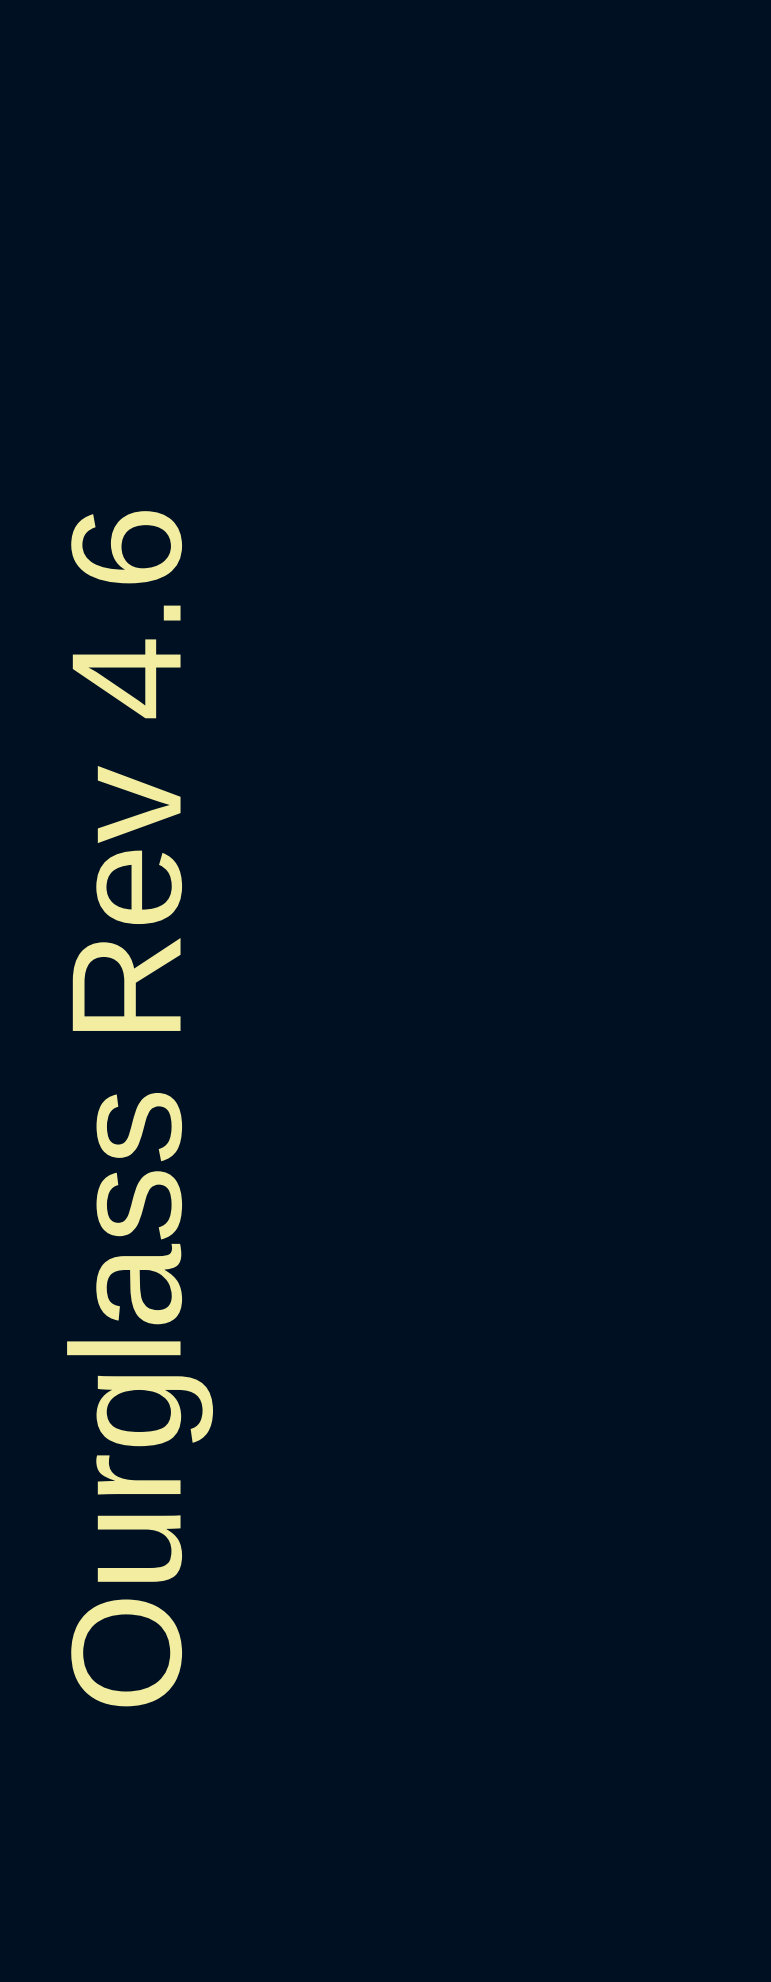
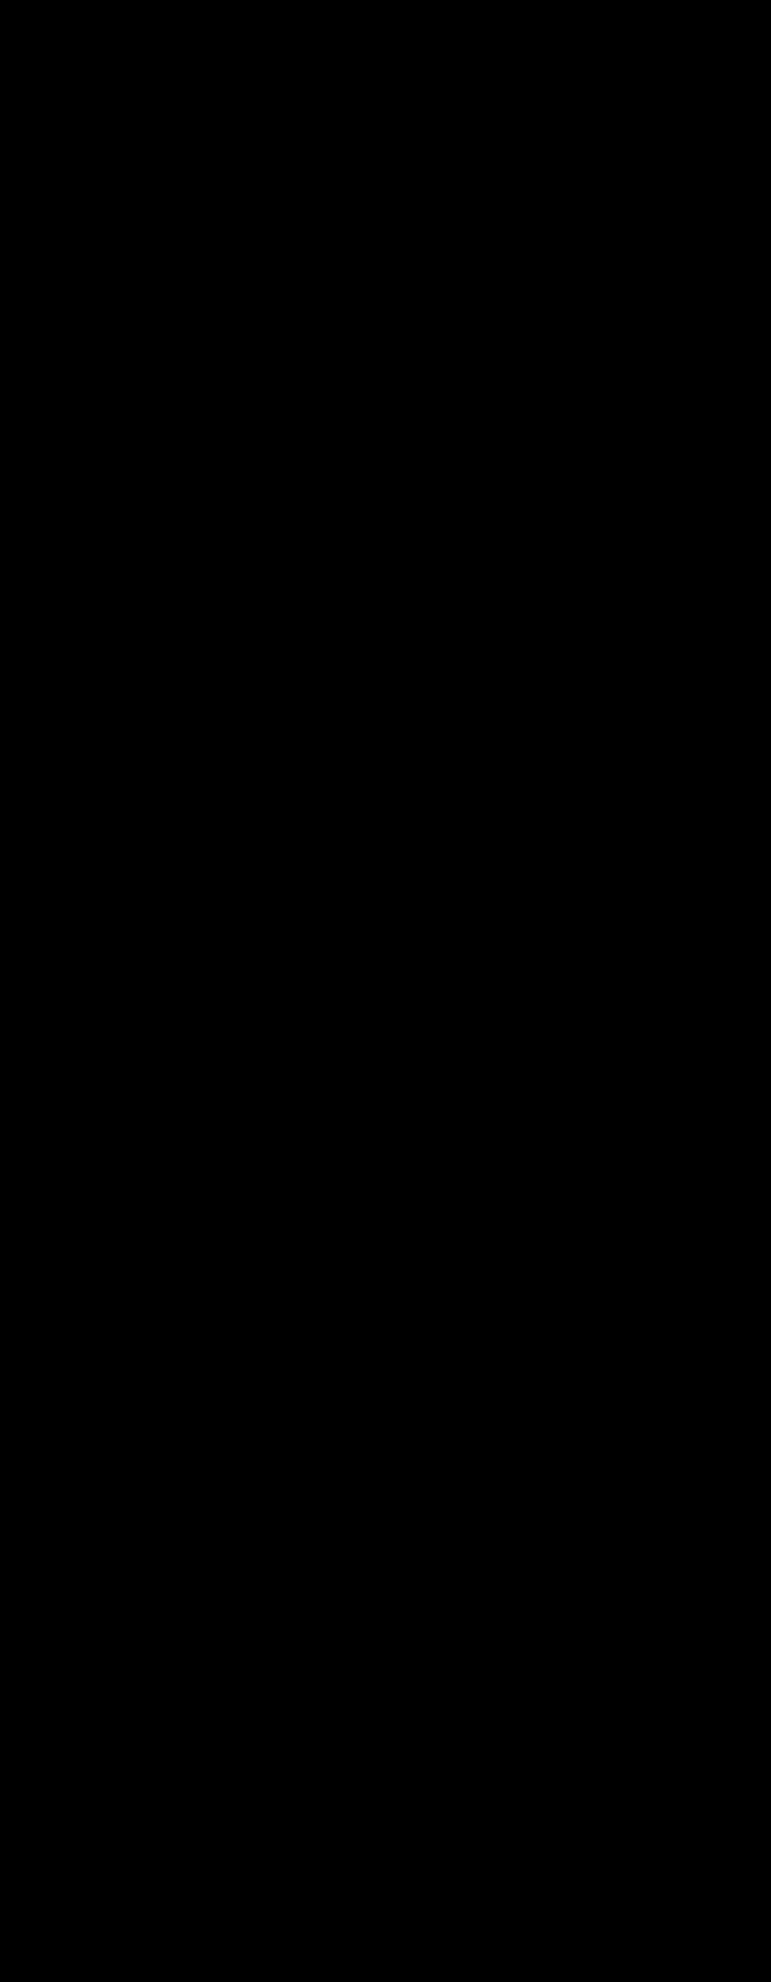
text: Ourglass Rev 4.6 (140, 1108) -> none

